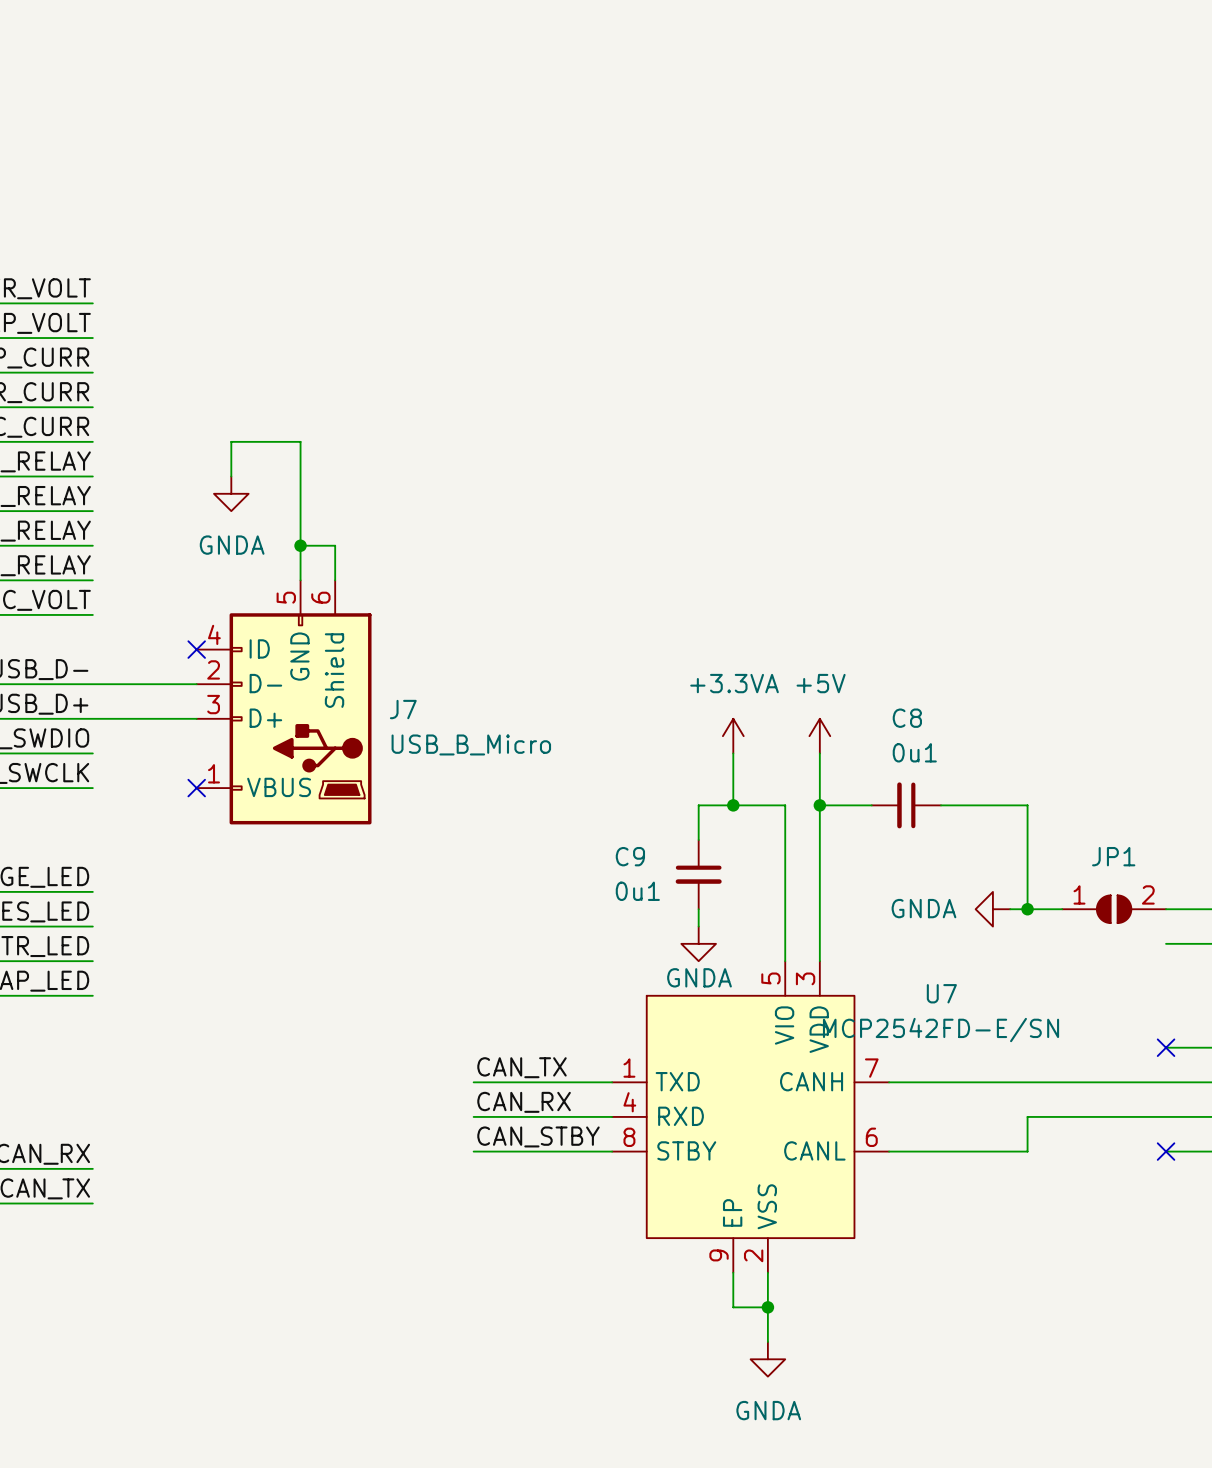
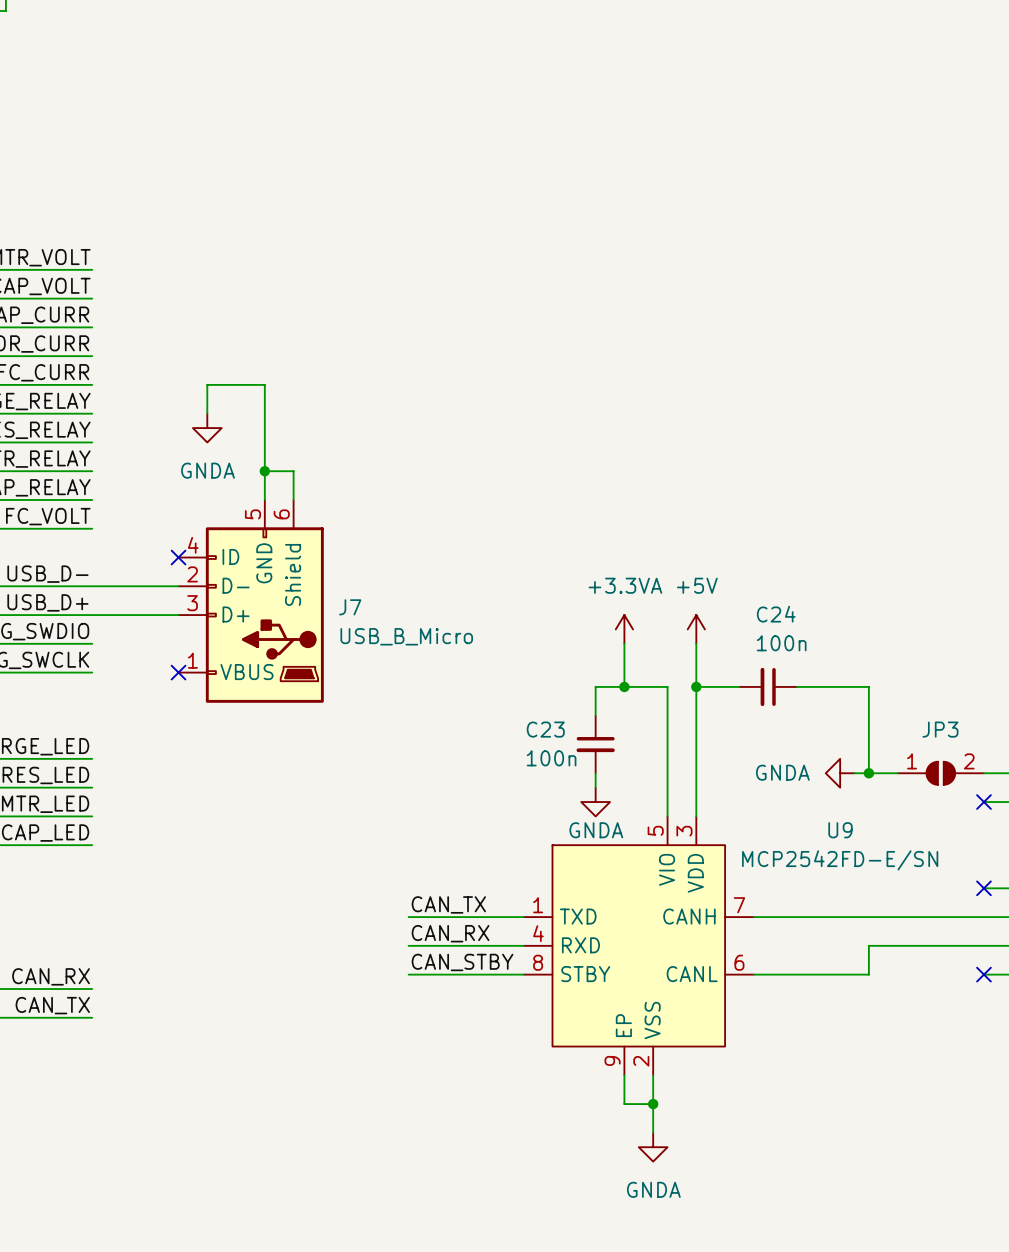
C8 name: C8 (907, 718) -> C24 (776, 614)
C8 value: 0u1 (914, 752) -> 100n (781, 643)
C9 name: C9 (630, 856) -> C23 (545, 729)
JP1 name: JP1 (1113, 856) -> JP3 (940, 729)
C9 value: 0u1 (637, 891) -> 100n (551, 758)
no-connect mark: none -> (983, 802)
U7 name: U7 (941, 993) -> U9 (840, 830)
U7 value position: MCP2542FD-E/SN (941, 1030) -> MCP2542FD-E/SN (840, 860)

